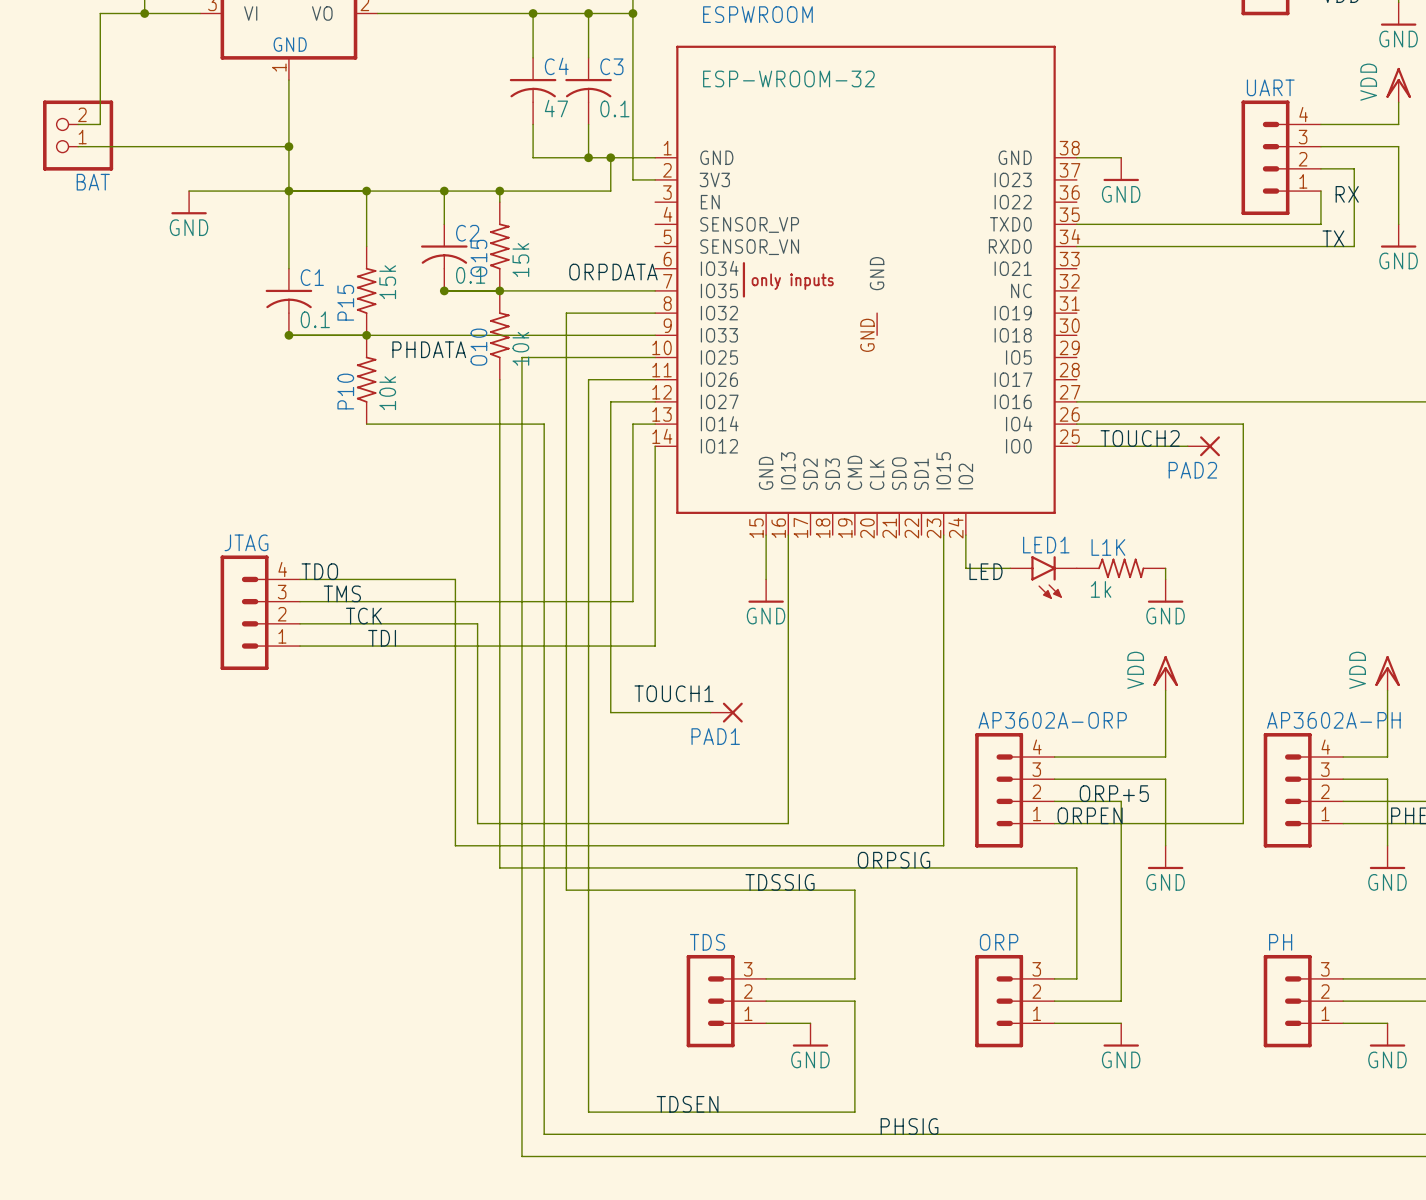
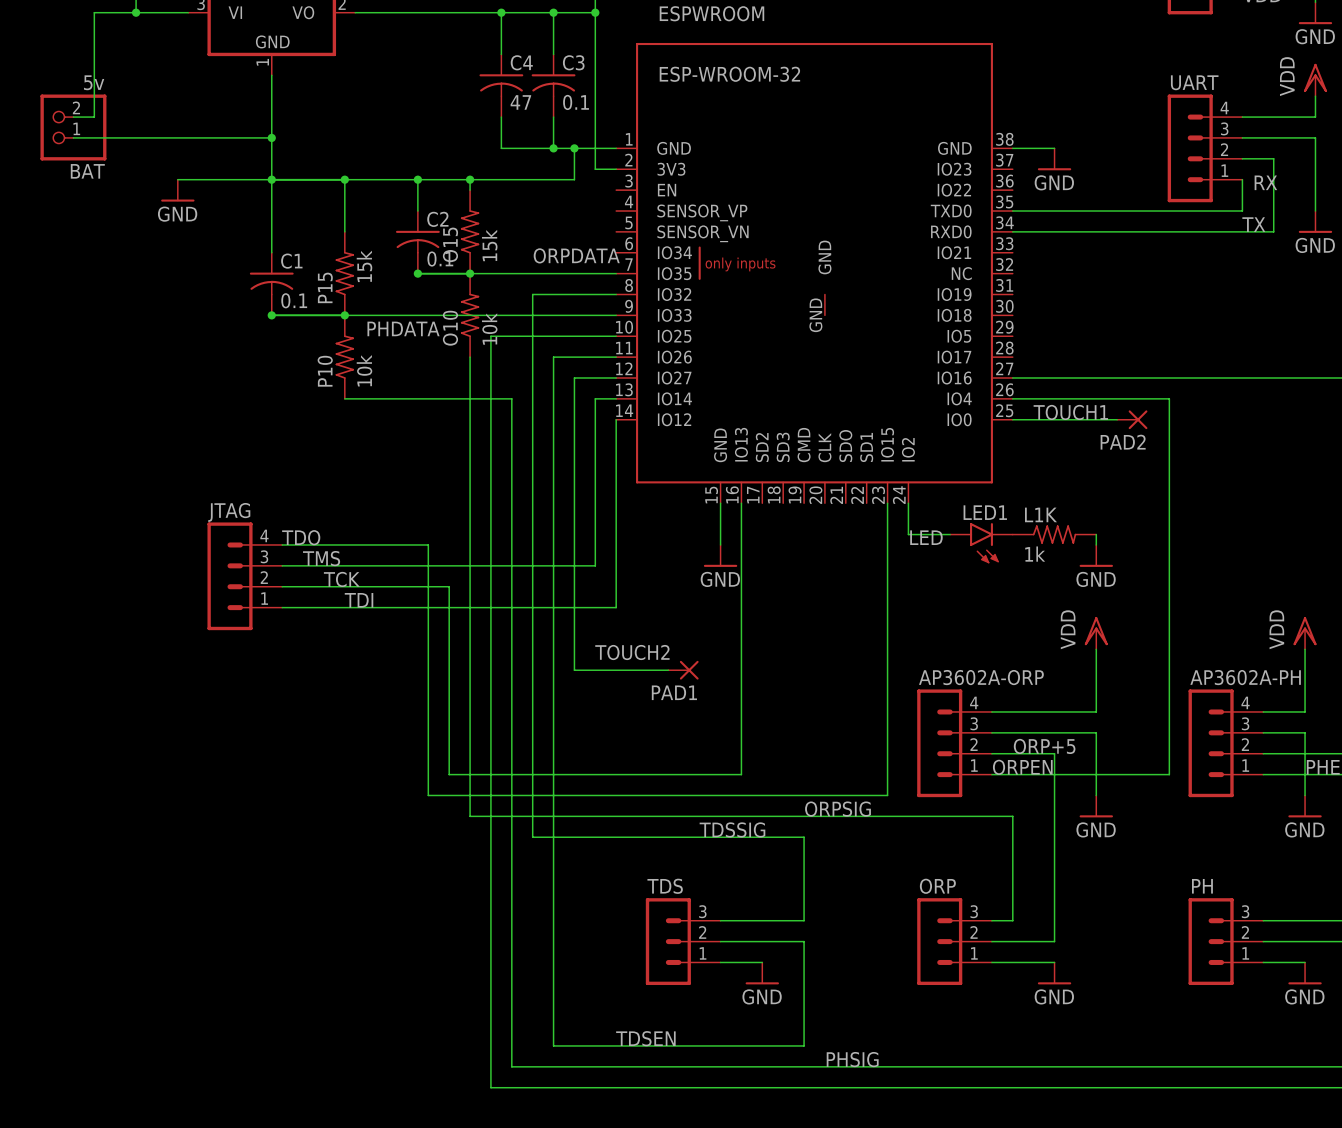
BAT value: none -> 5v (94, 82)
label: TOUCH2 (1140, 438) -> TOUCH1 (1070, 412)
label: TOUCH1 (674, 693) -> TOUCH2 (632, 652)

